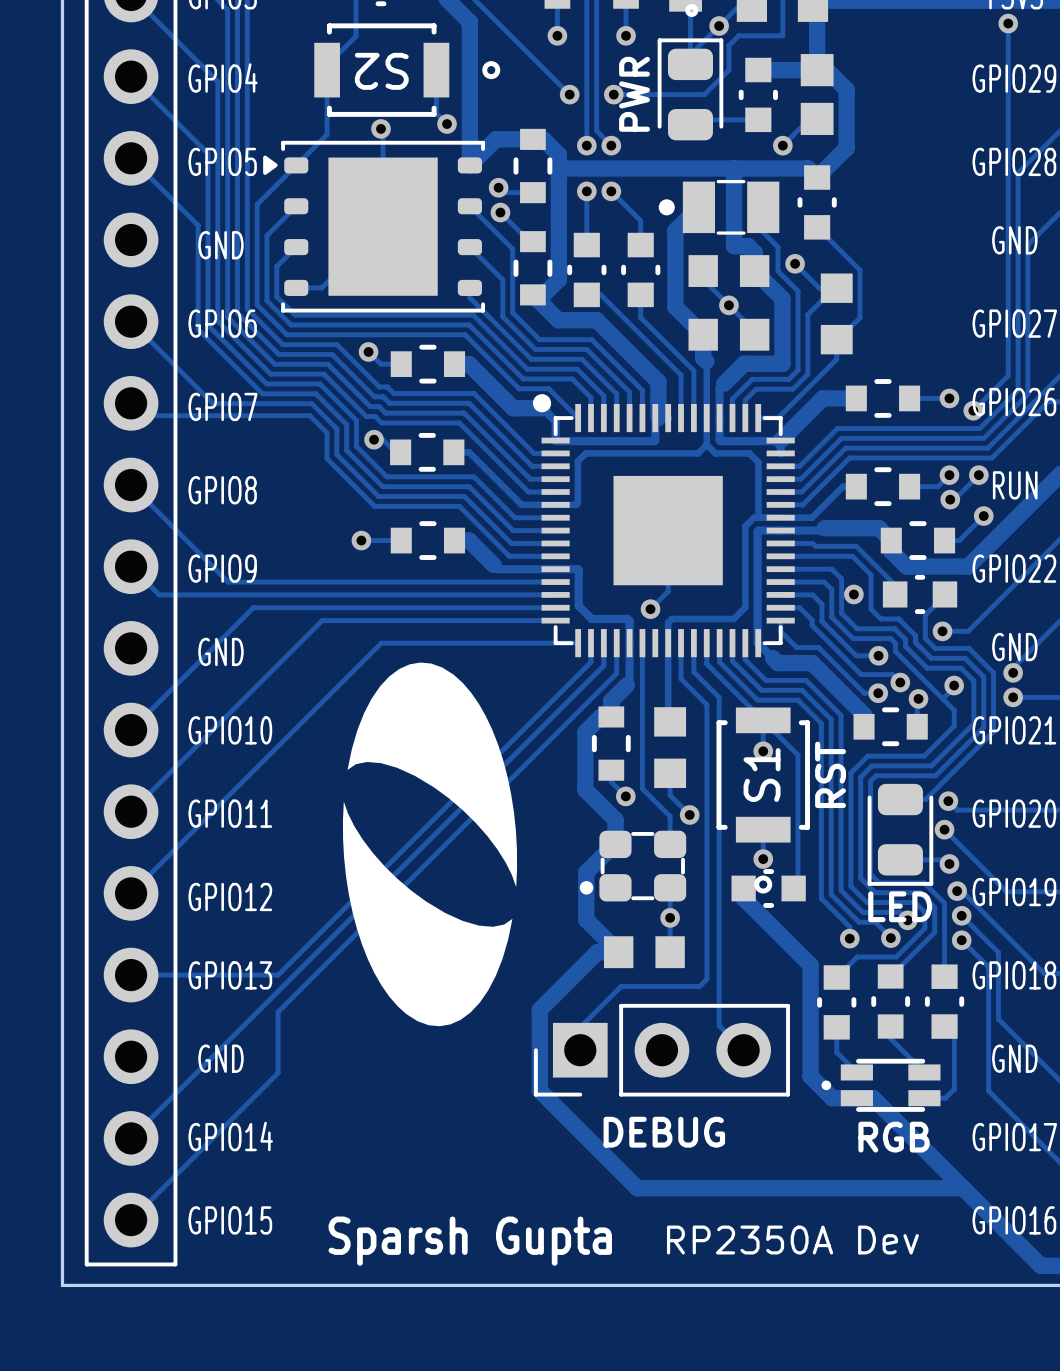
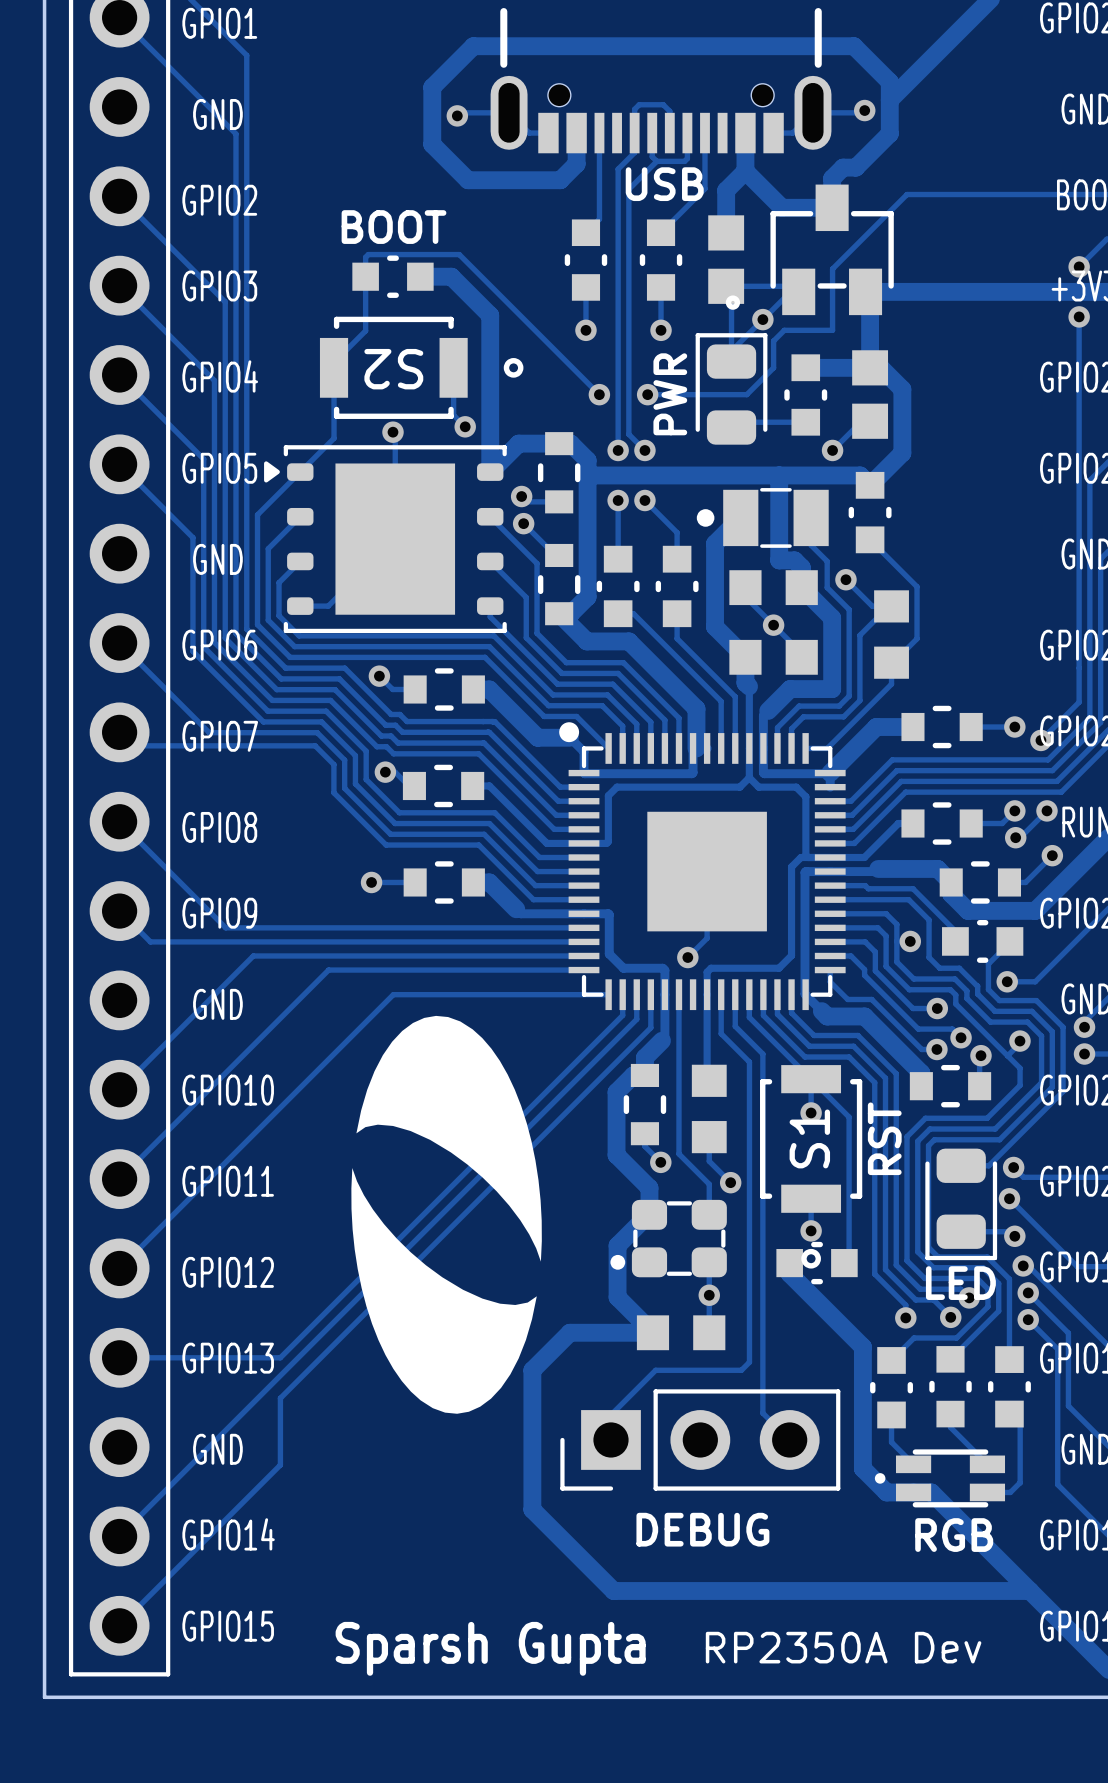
track: (597, 952) (539, 1009) (539, 1090) (637, 1188) -> (629, 1332) (569, 1332) (532, 1370) (532, 1509) (613, 1590) (673, 1590)

